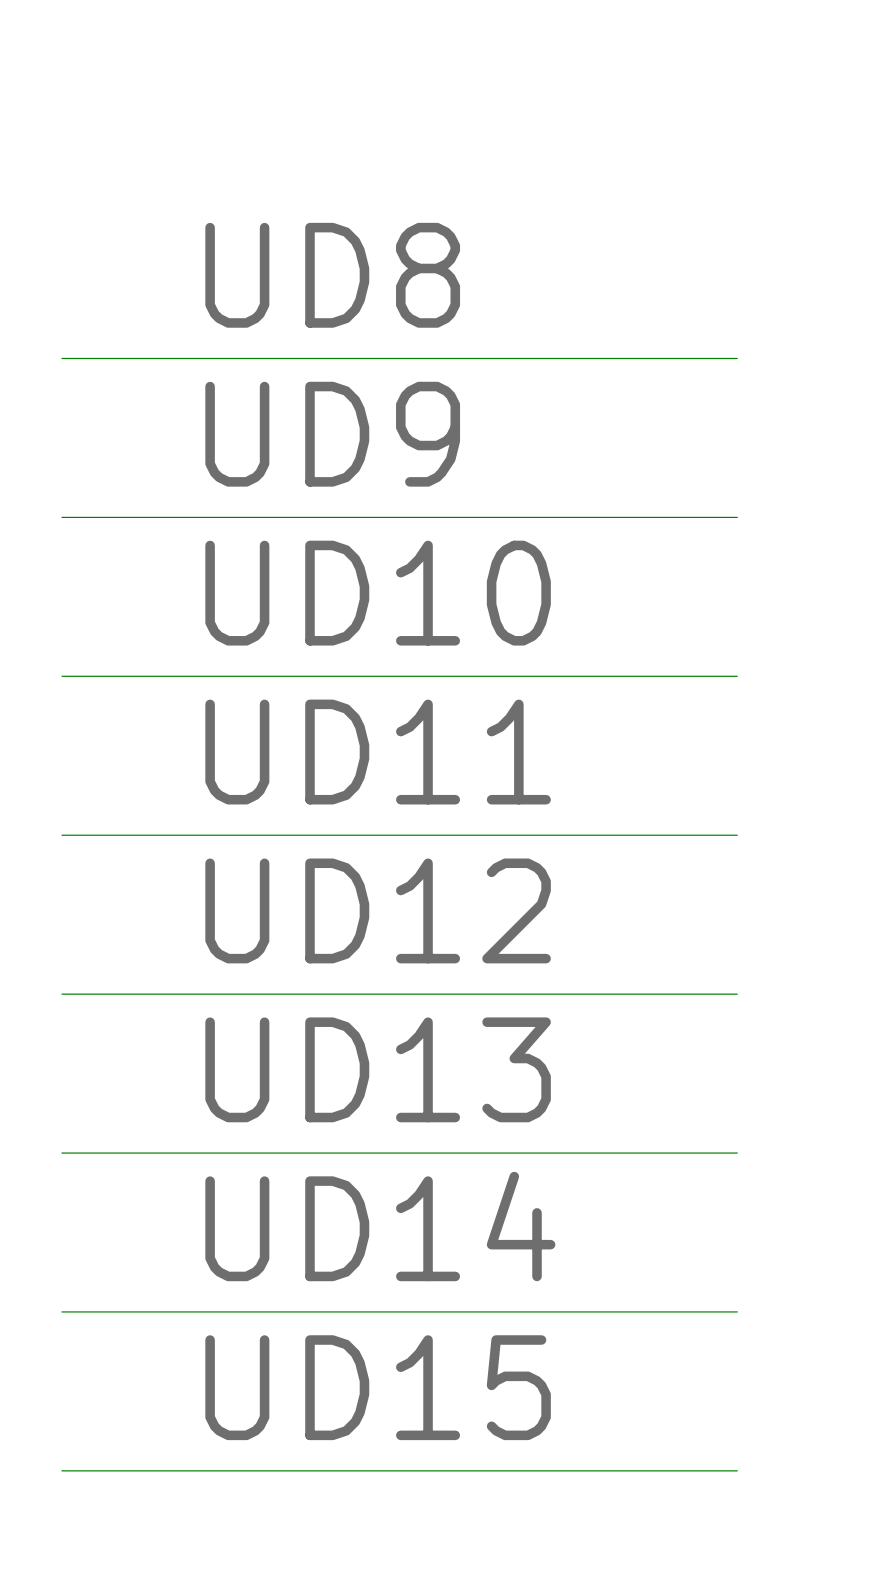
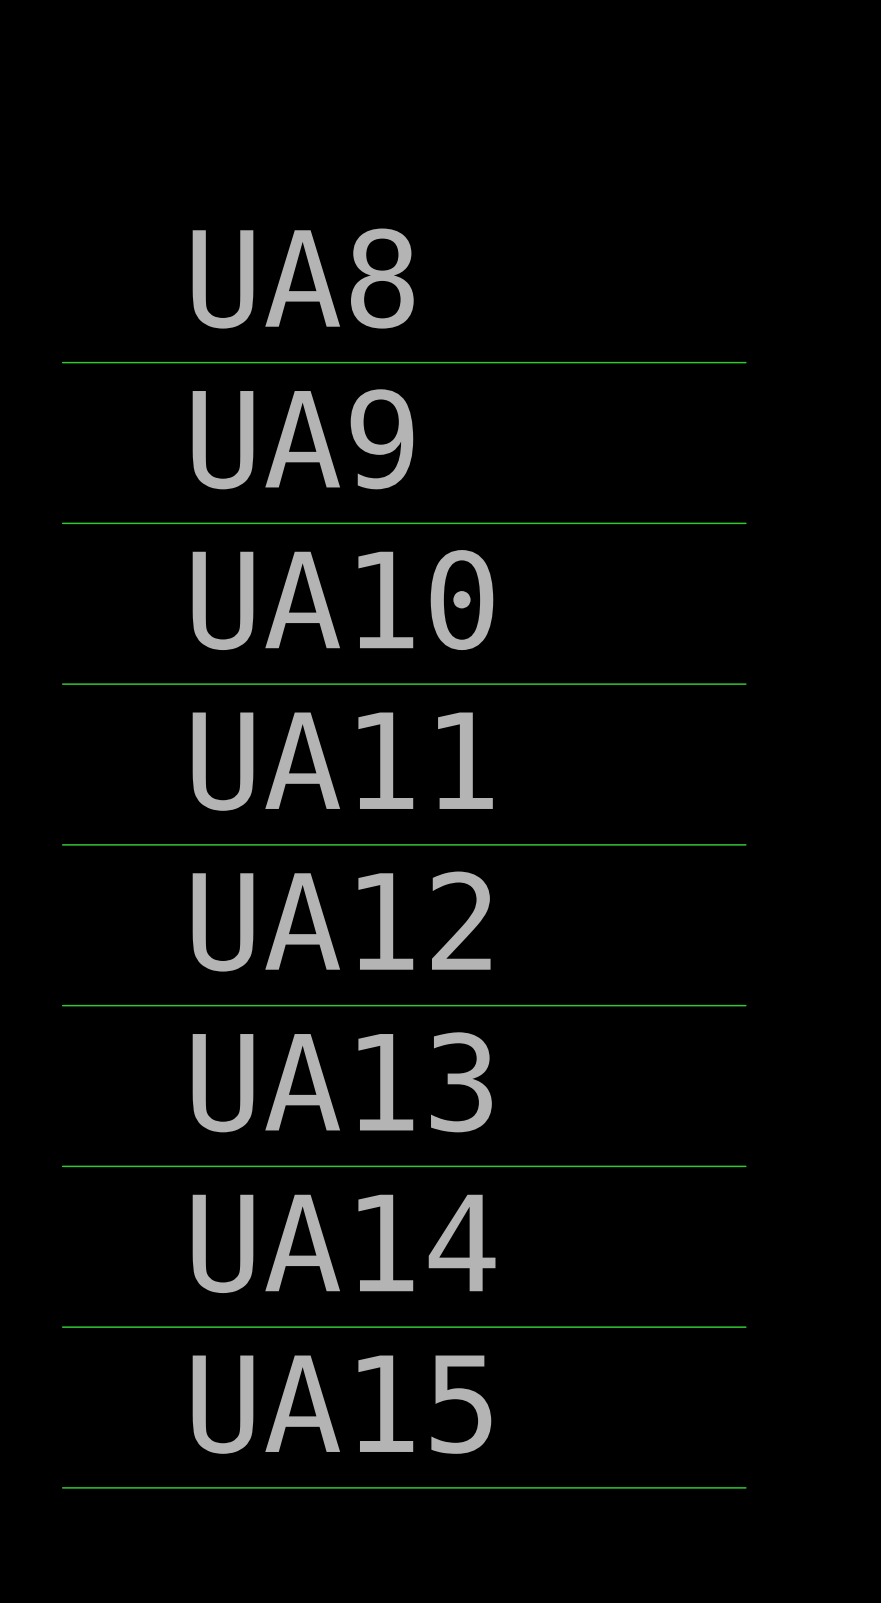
label: UD8 (332, 275) -> UA8 (303, 278)
label: UD9 (332, 434) -> UA9 (302, 439)
label: UD10 (378, 593) -> UA10 (342, 600)
label: UD11 (378, 752) -> UA11 (342, 761)
label: UD12 (378, 910) -> UA12 (341, 921)
label: UD13 (378, 1069) -> UA13 (342, 1082)
label: UD14 (380, 1226) -> UA14 (344, 1243)
label: UD15 (378, 1387) -> UA15 (341, 1404)

